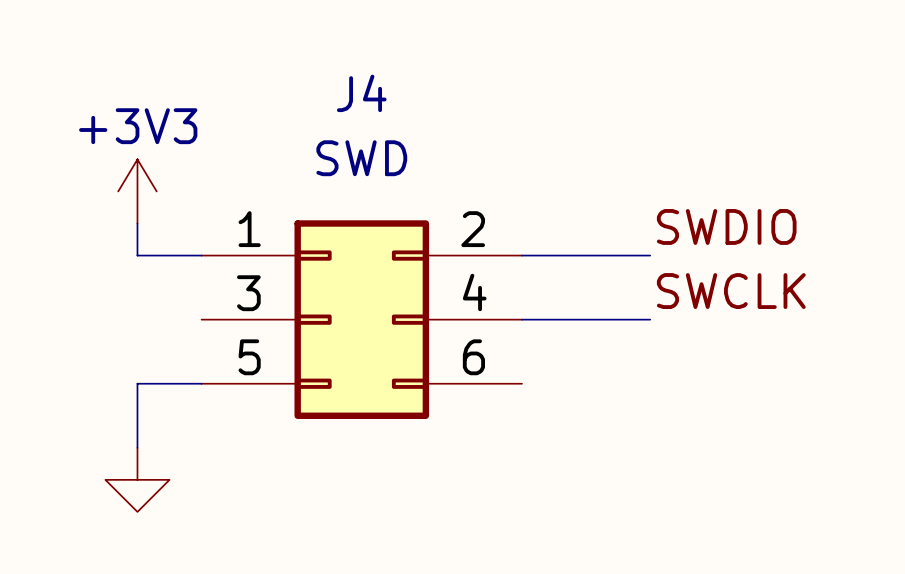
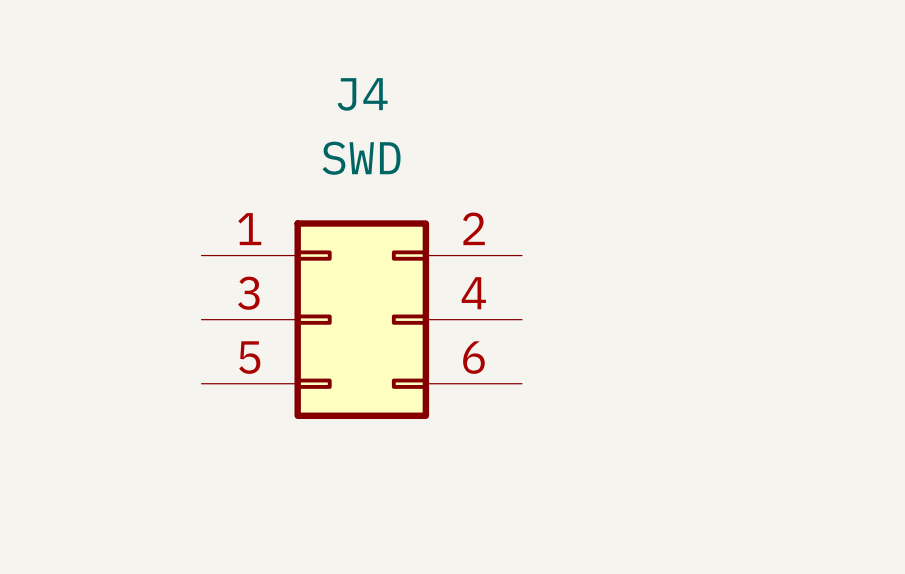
power symbol: +3V3 (137, 191) -> none
wire: (137, 223) (137, 255) (201, 255) -> none
label: SWDIO (726, 226) -> none
wire: (522, 255) (650, 255) -> none
label: SWCLK (731, 291) -> none
wire: (522, 319) (650, 319) -> none
wire: (201, 383) (137, 383) (137, 447) -> none
power symbol: (137, 479) -> none

